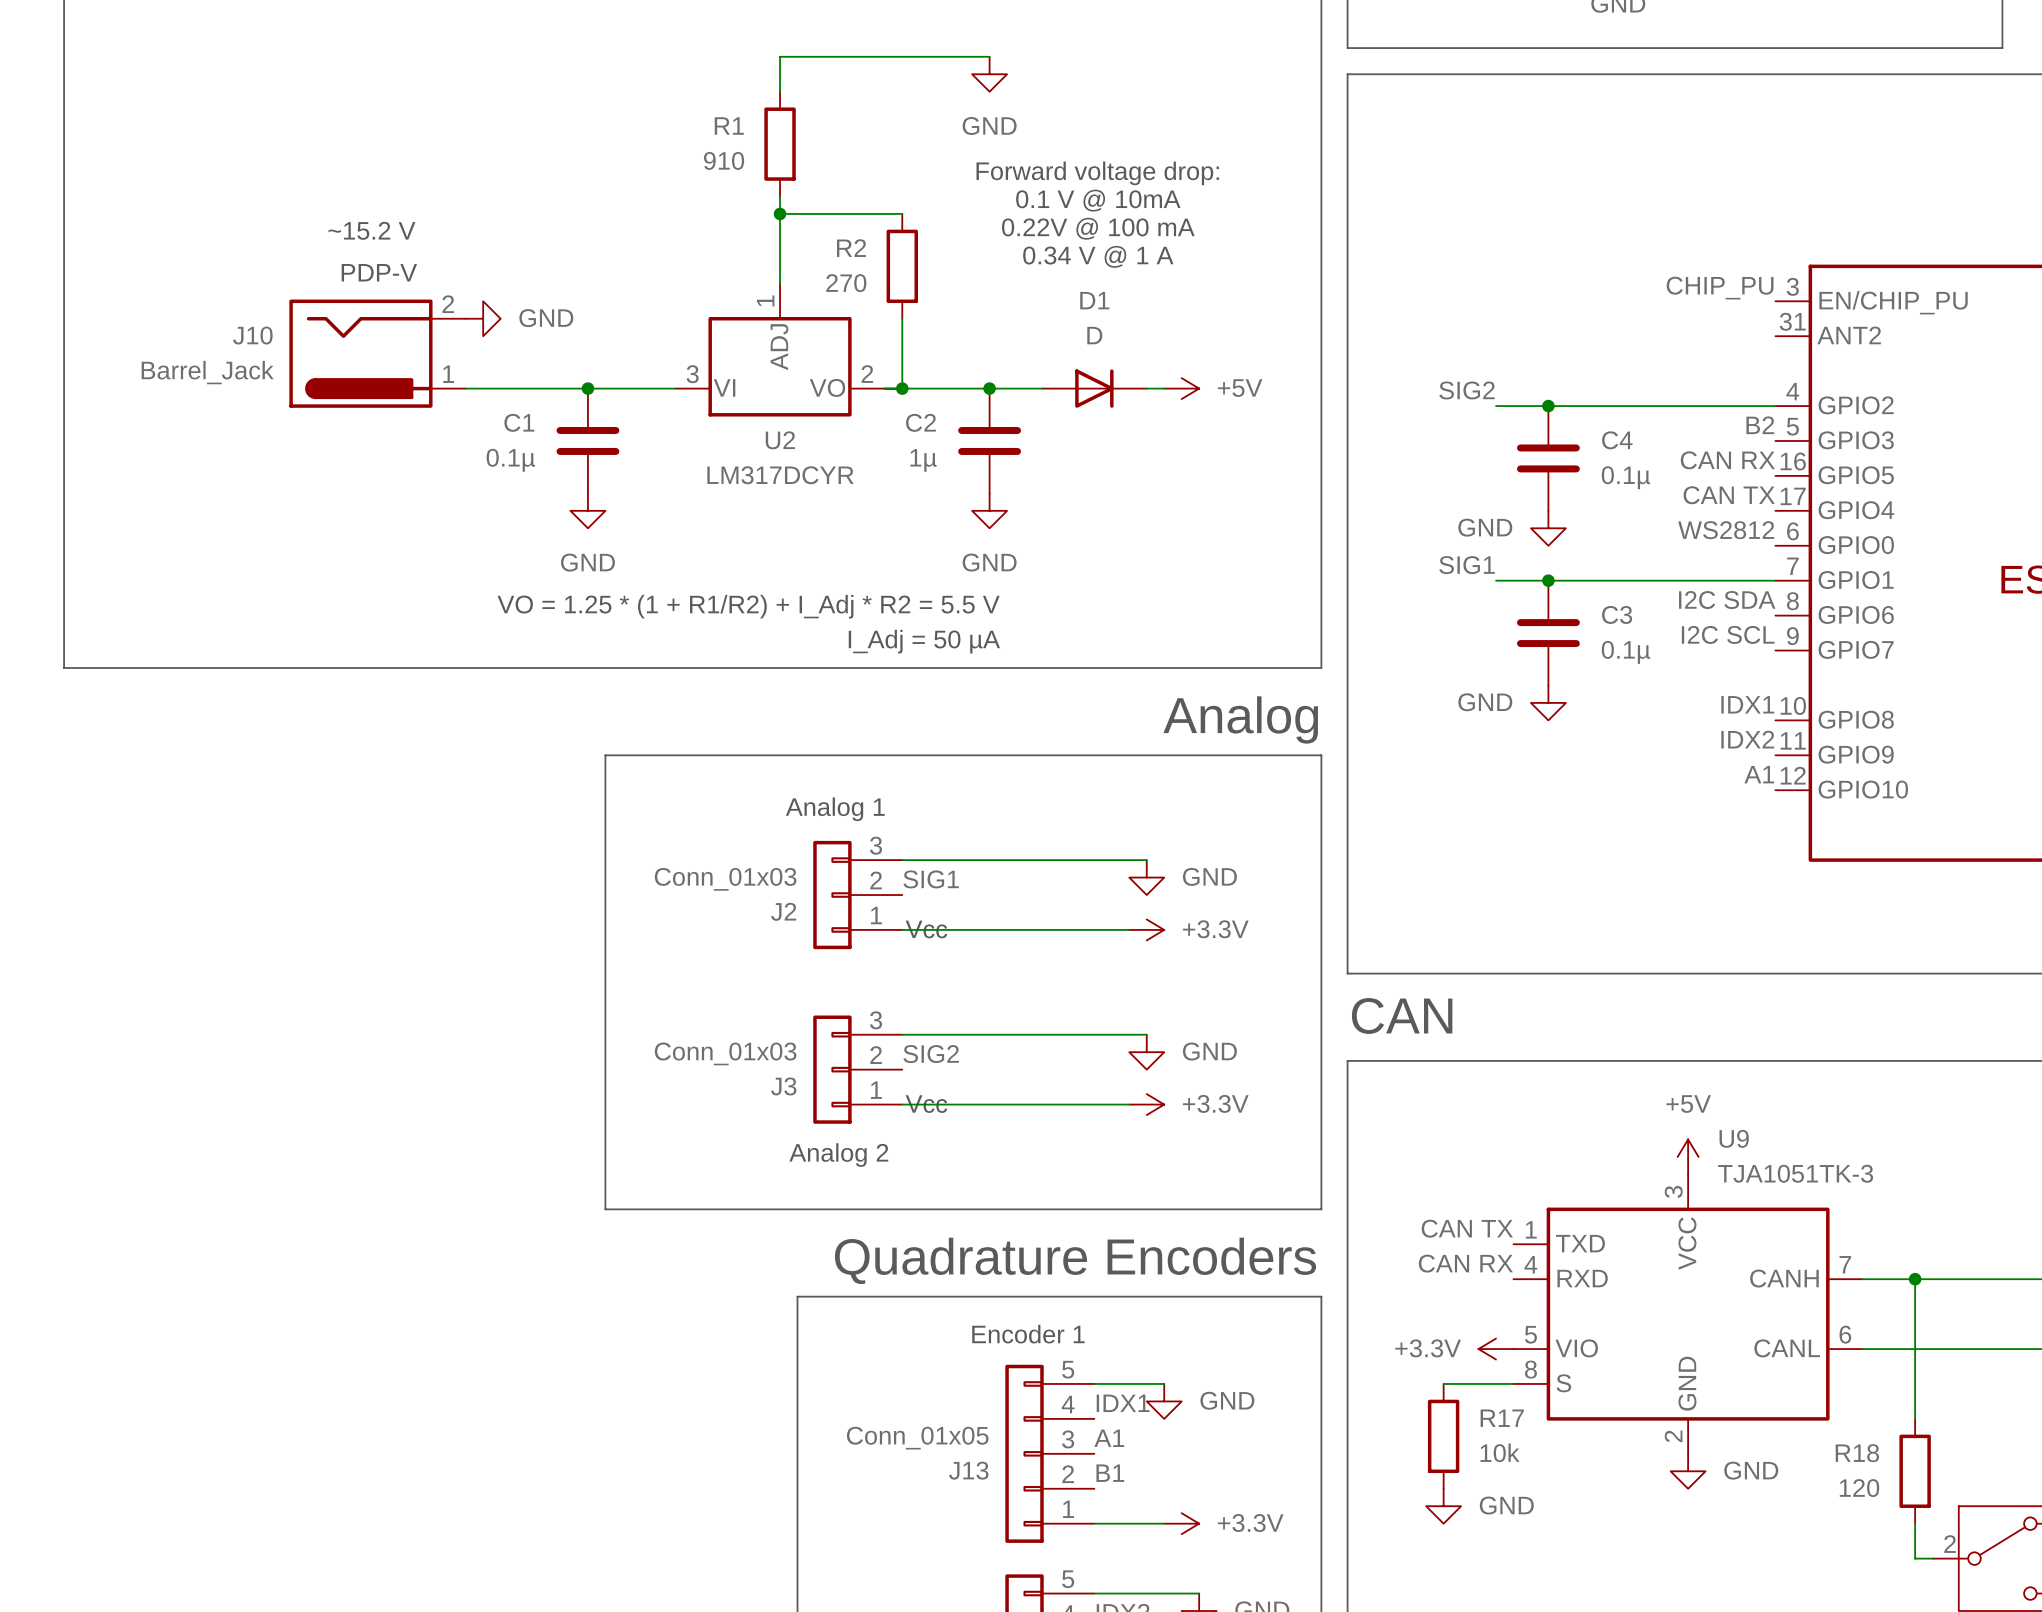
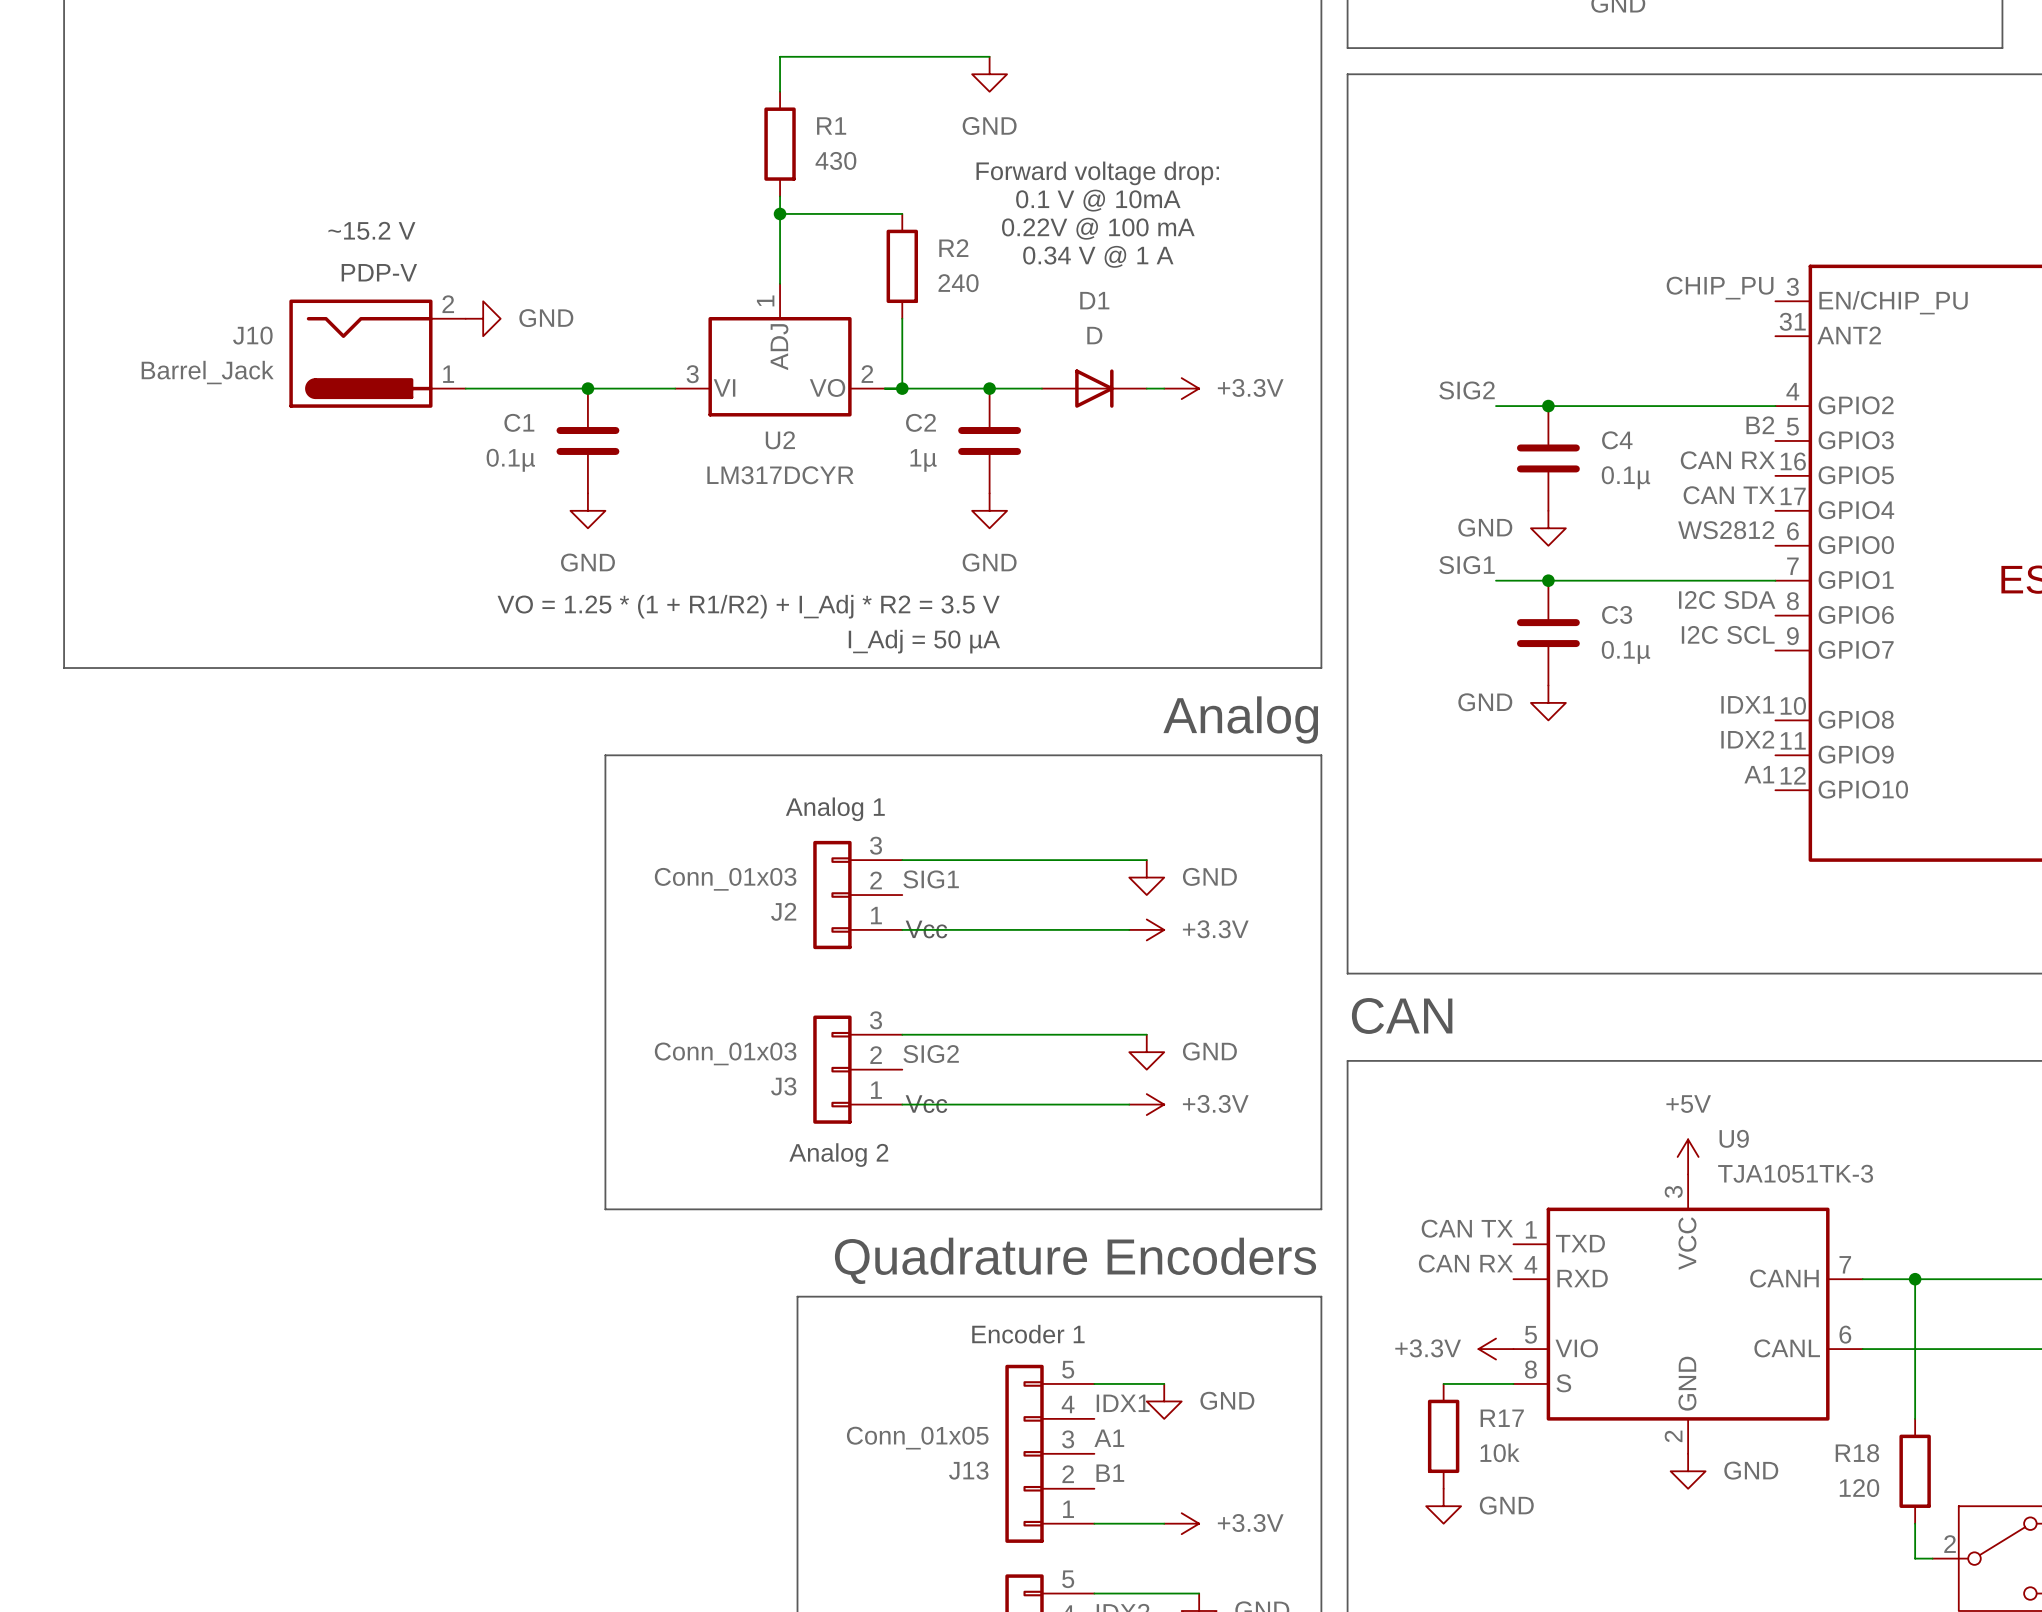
R1 name position: R1 (729, 126) -> R1 (831, 126)
R1 value: 910 (724, 160) -> 430 (835, 160)
R2 name position: R2 (851, 248) -> R2 (953, 248)
R2 value: 270 (846, 283) -> 240 (958, 283)
power symbol: +5V (1181, 388) -> +3.3V (1181, 388)
text: VO = 1.25 * (1 + R1/R2) + I_Adj * R2 = 5.5 V (748, 606) -> VO = 1.25 * (1 + R1/R2) + I_Adj * R2 = 3.5 V (748, 606)

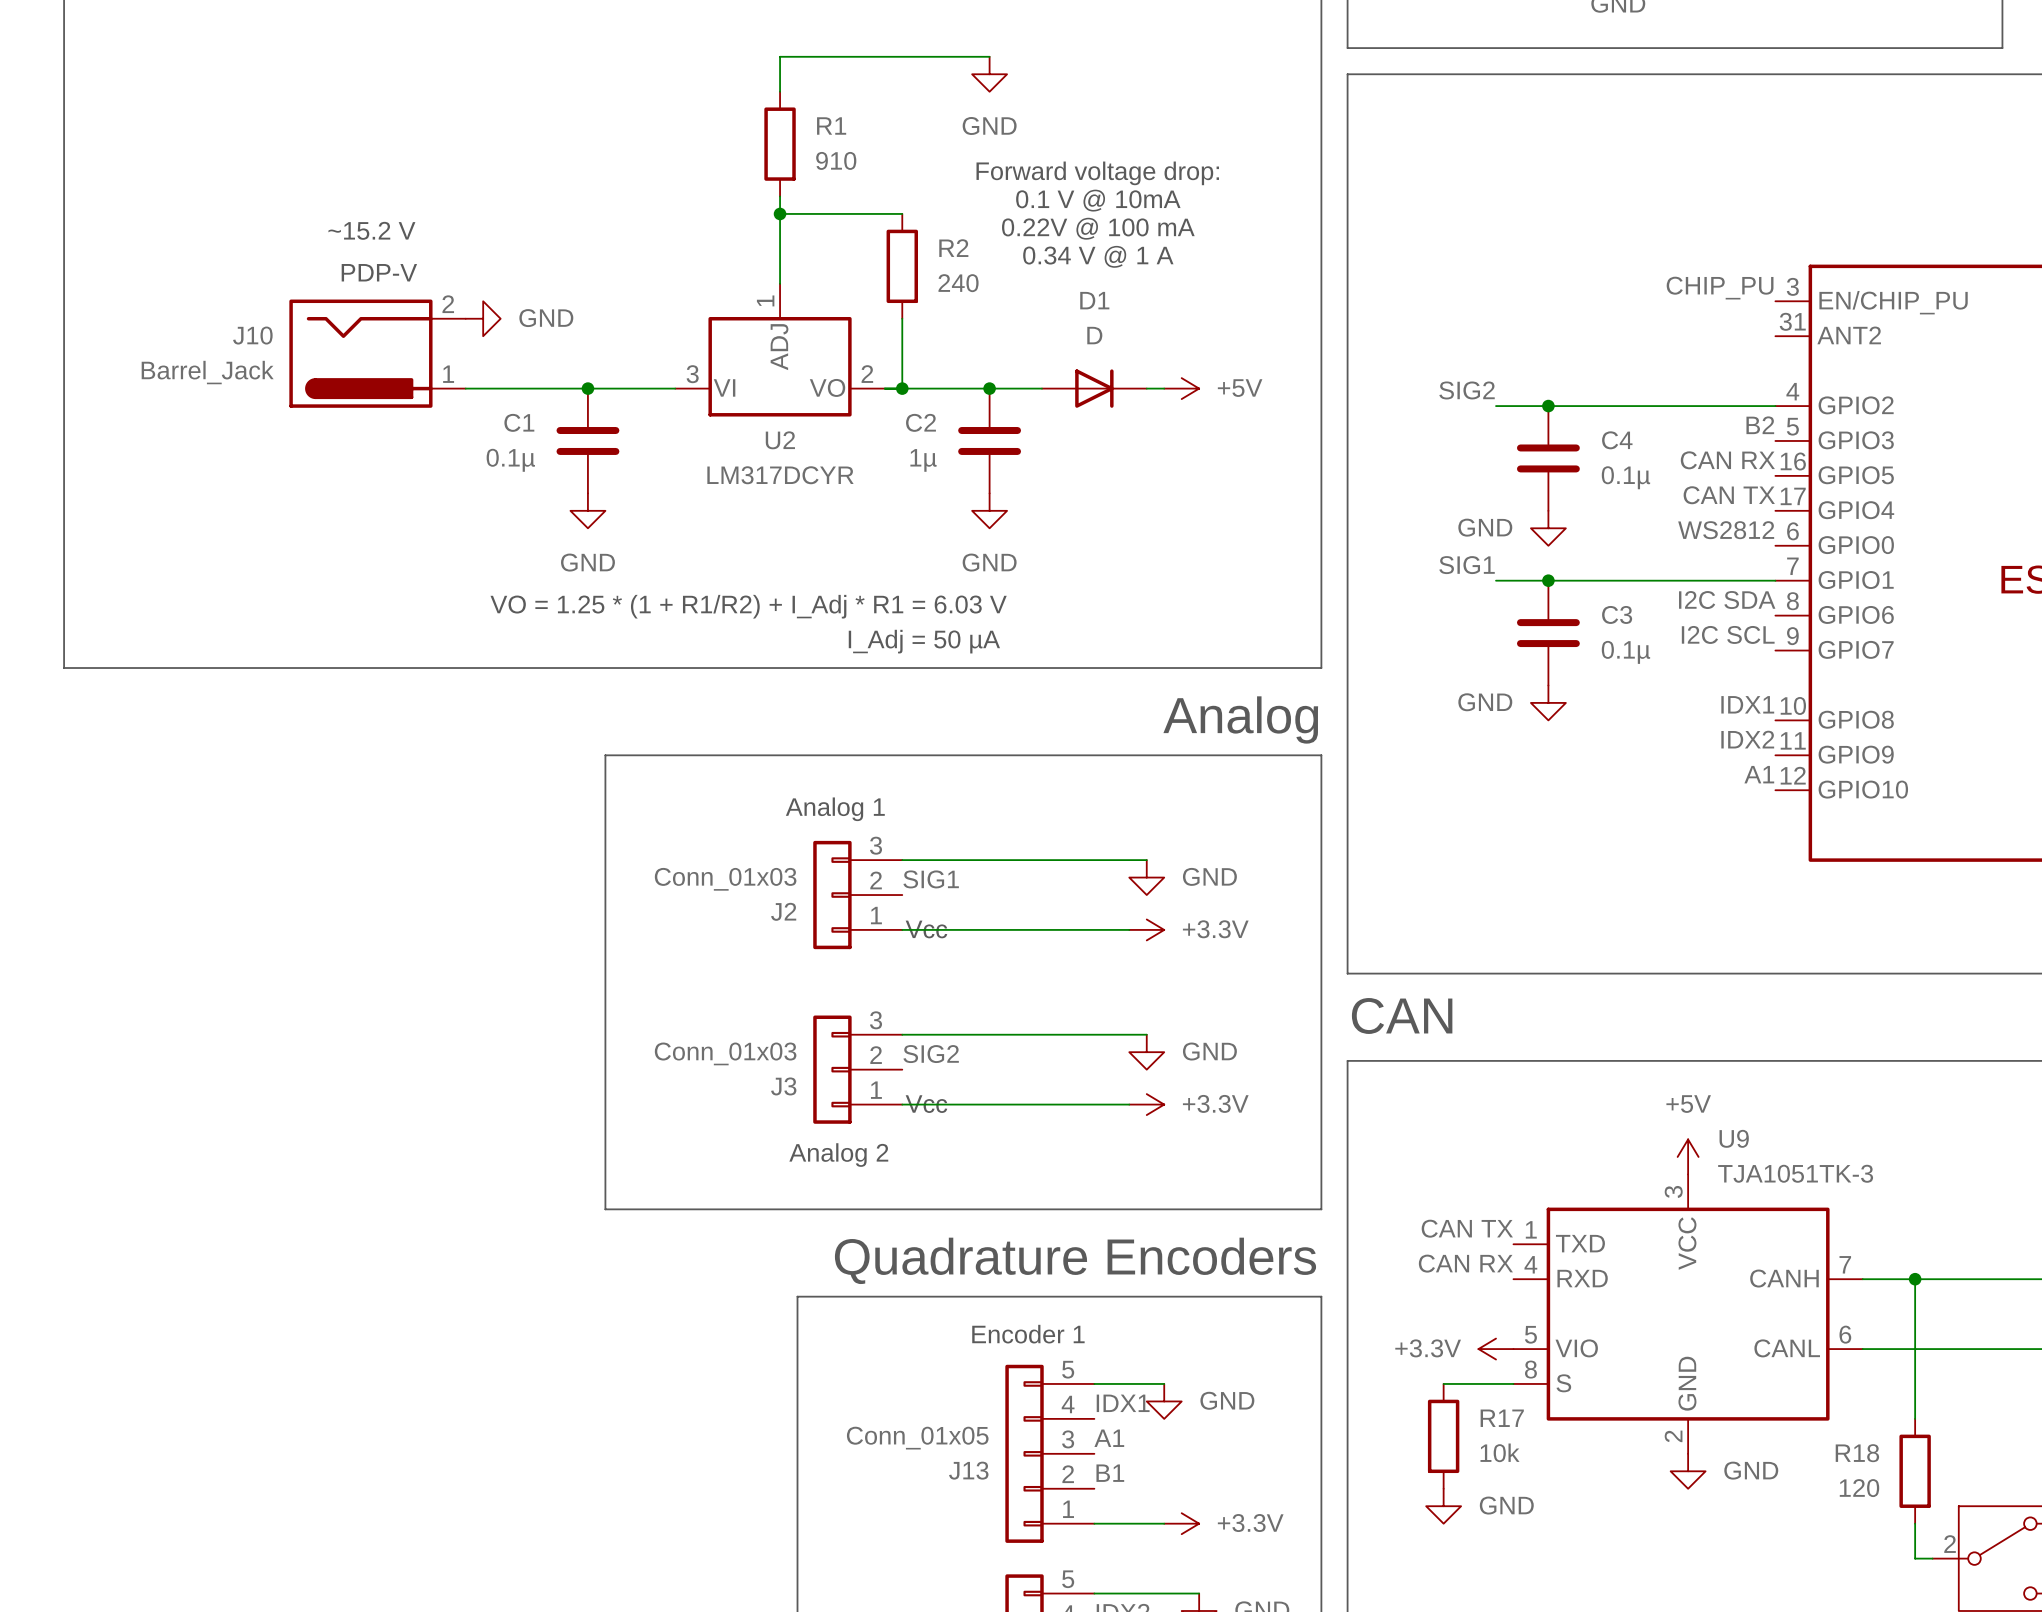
R1 value: 430 (835, 160) -> 910 (836, 160)
power symbol: +3.3V (1181, 388) -> +5V (1181, 388)
text: VO = 1.25 * (1 + R1/R2) + I_Adj * R2 = 3.5 V (748, 606) -> VO = 1.25 * (1 + R1/R2) + I_Adj * R1 = 6.03 V (748, 606)

